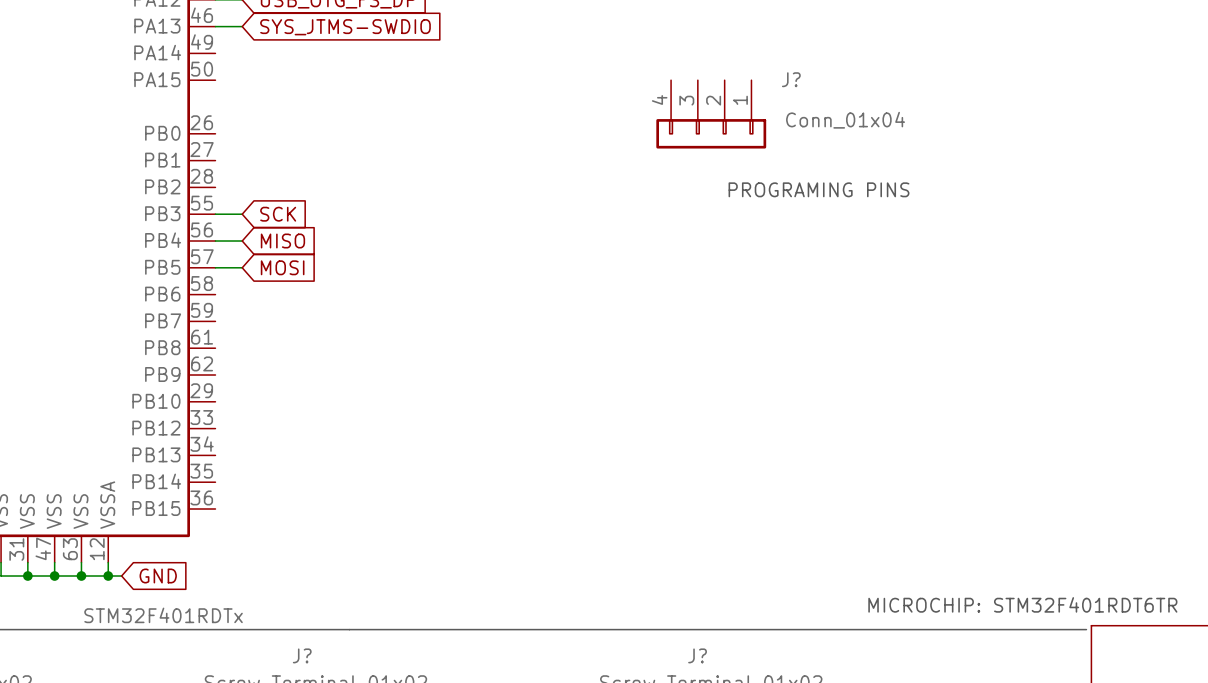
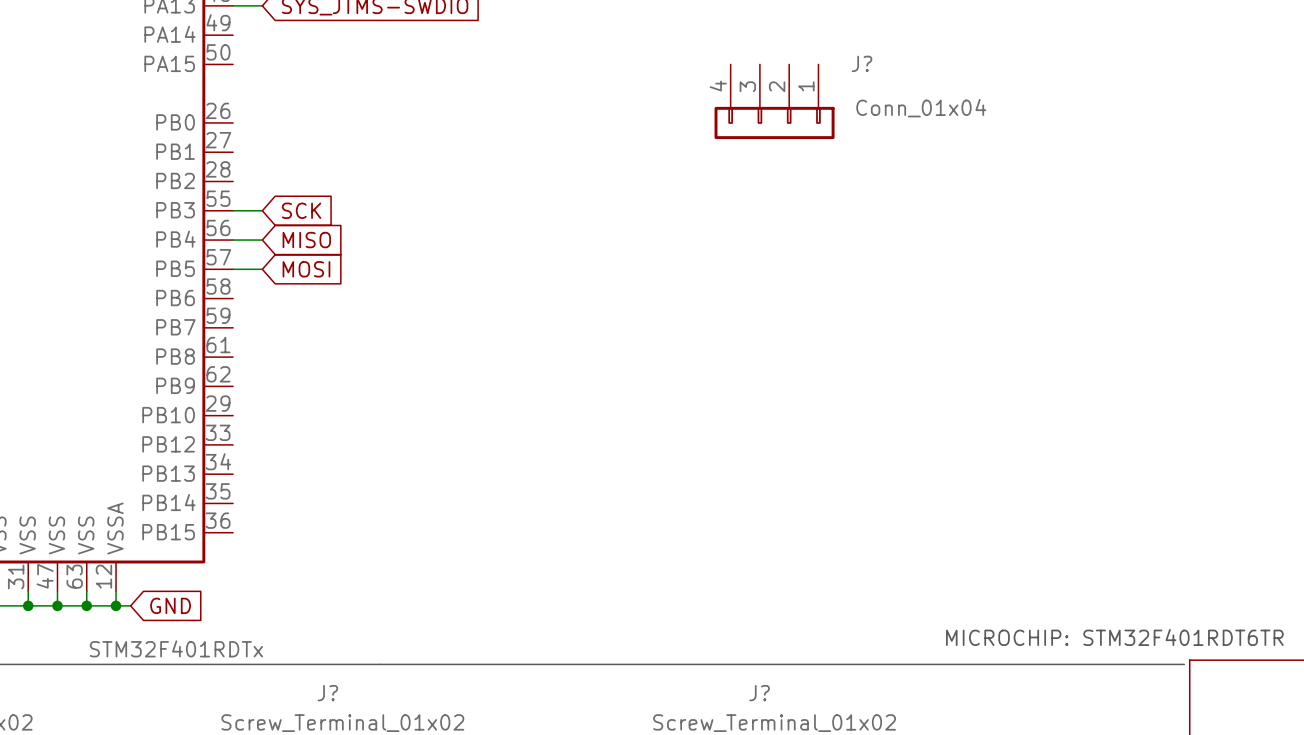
text: PROGRAMING PINS (818, 189) -> none

